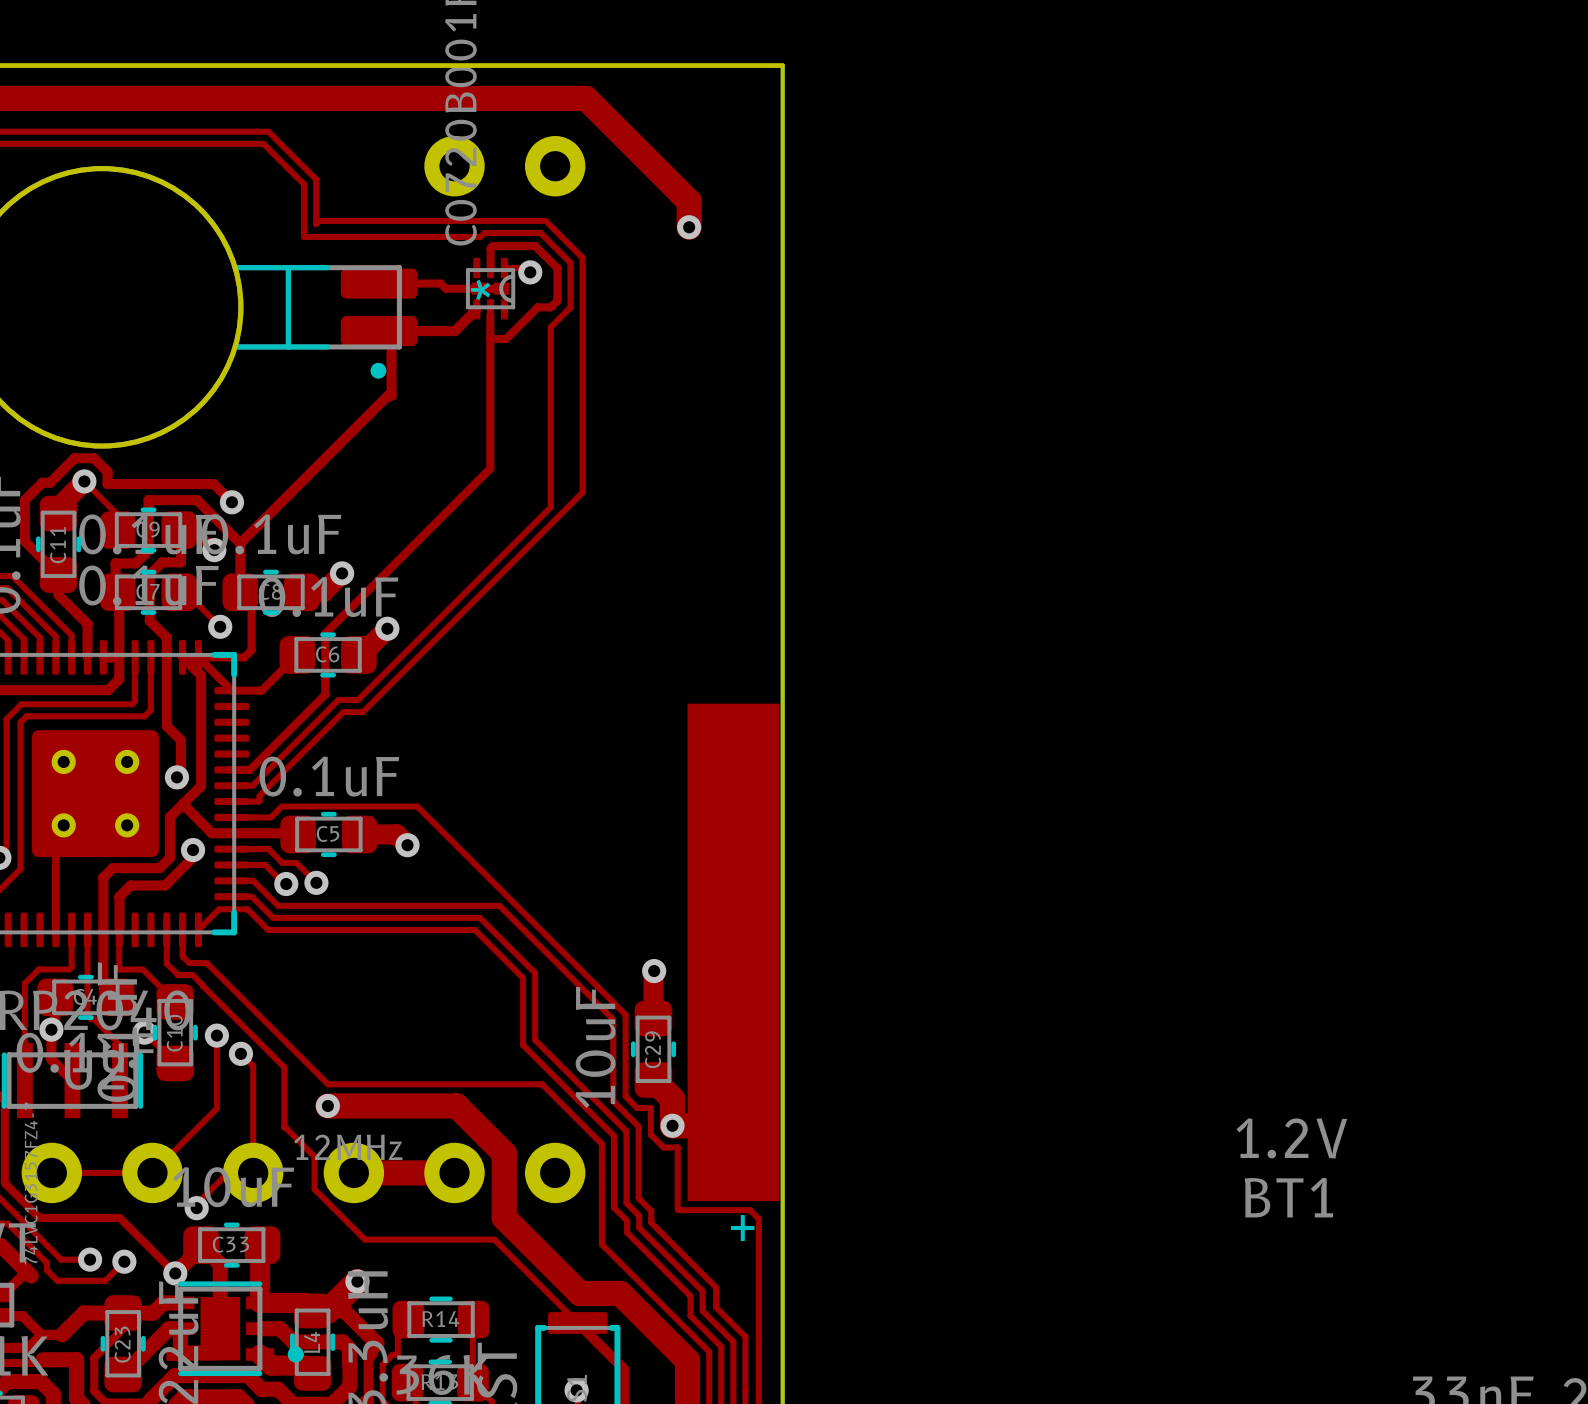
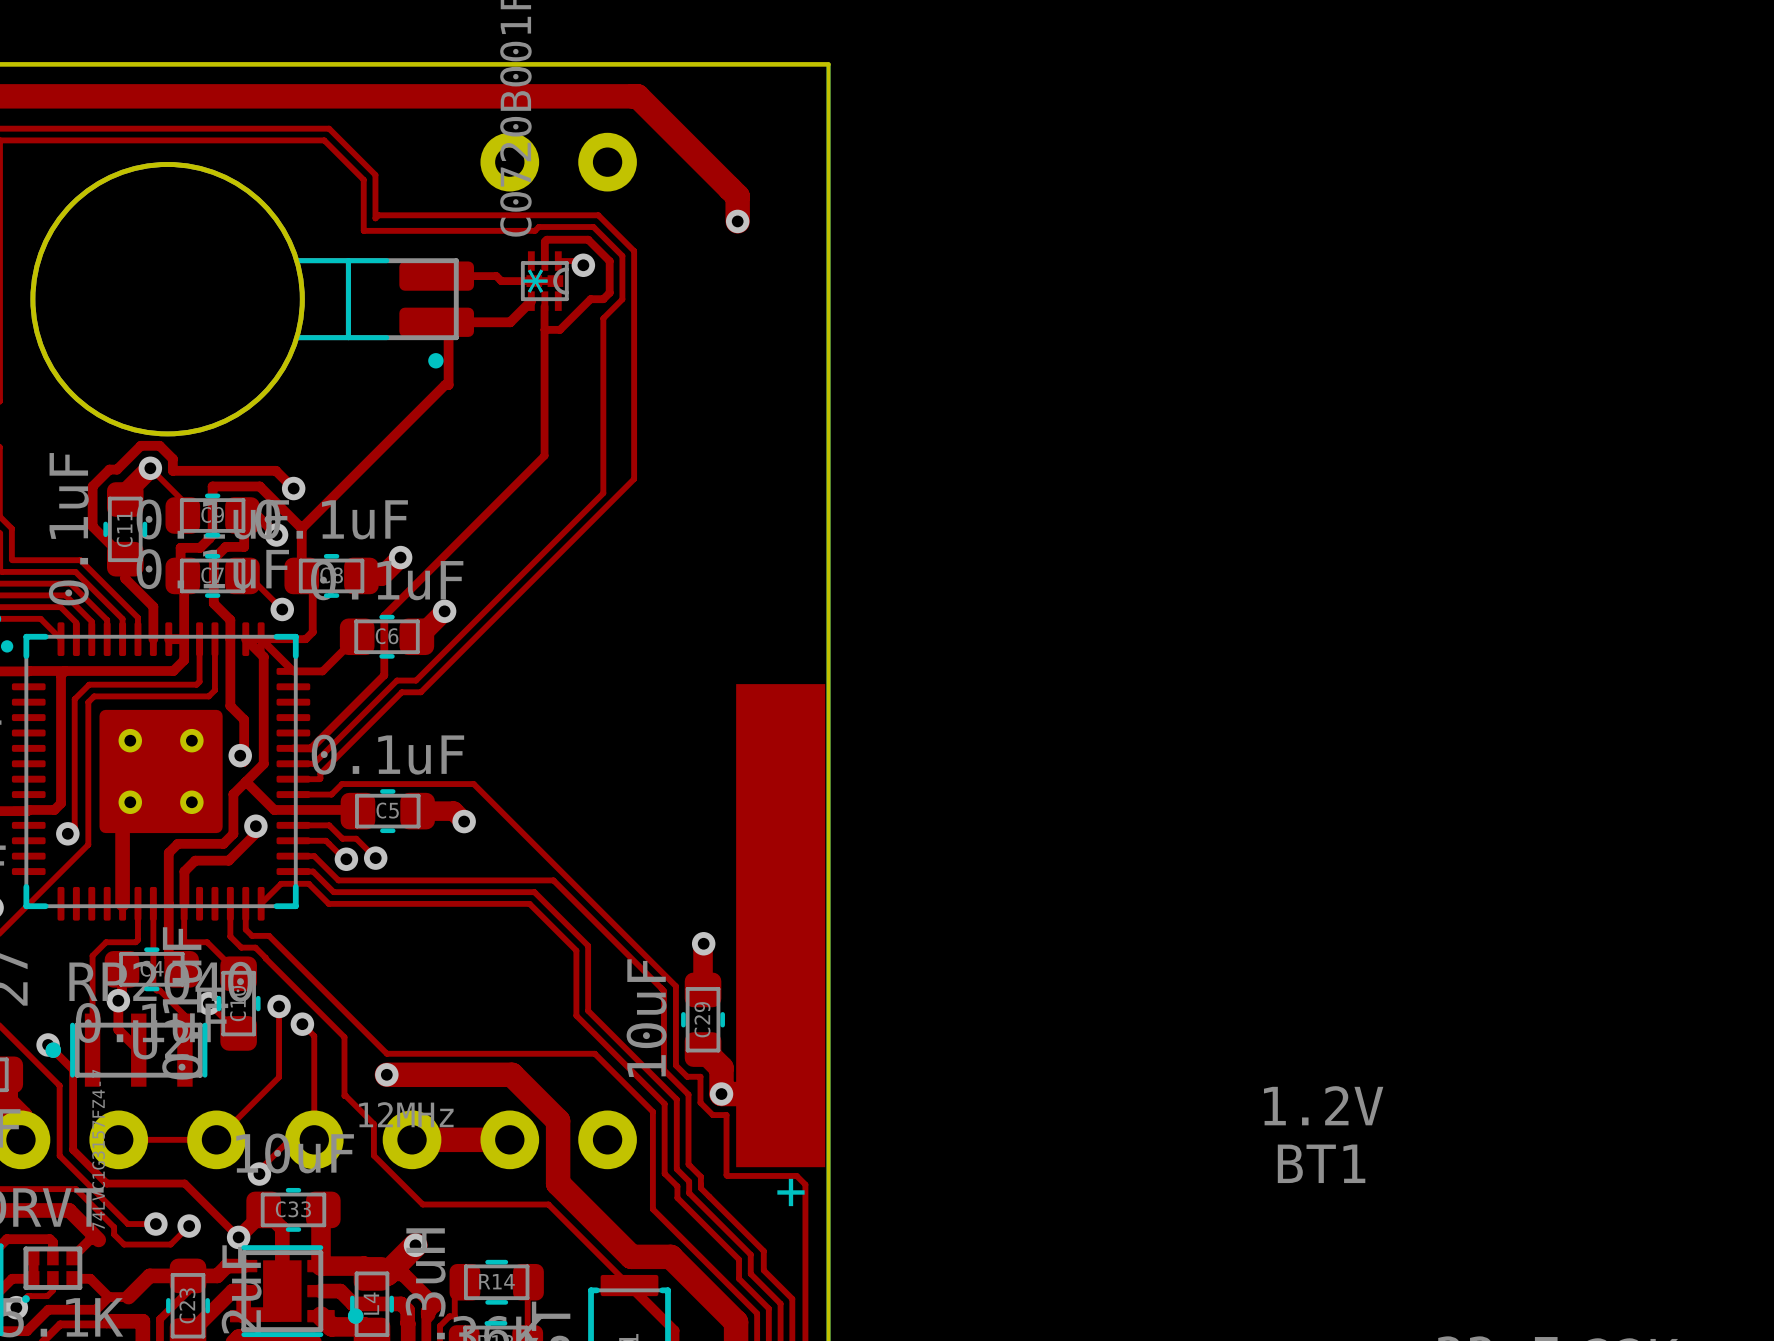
track width: thin (55, 833) (55, 929) -> thick (122, 809) (122, 903)

